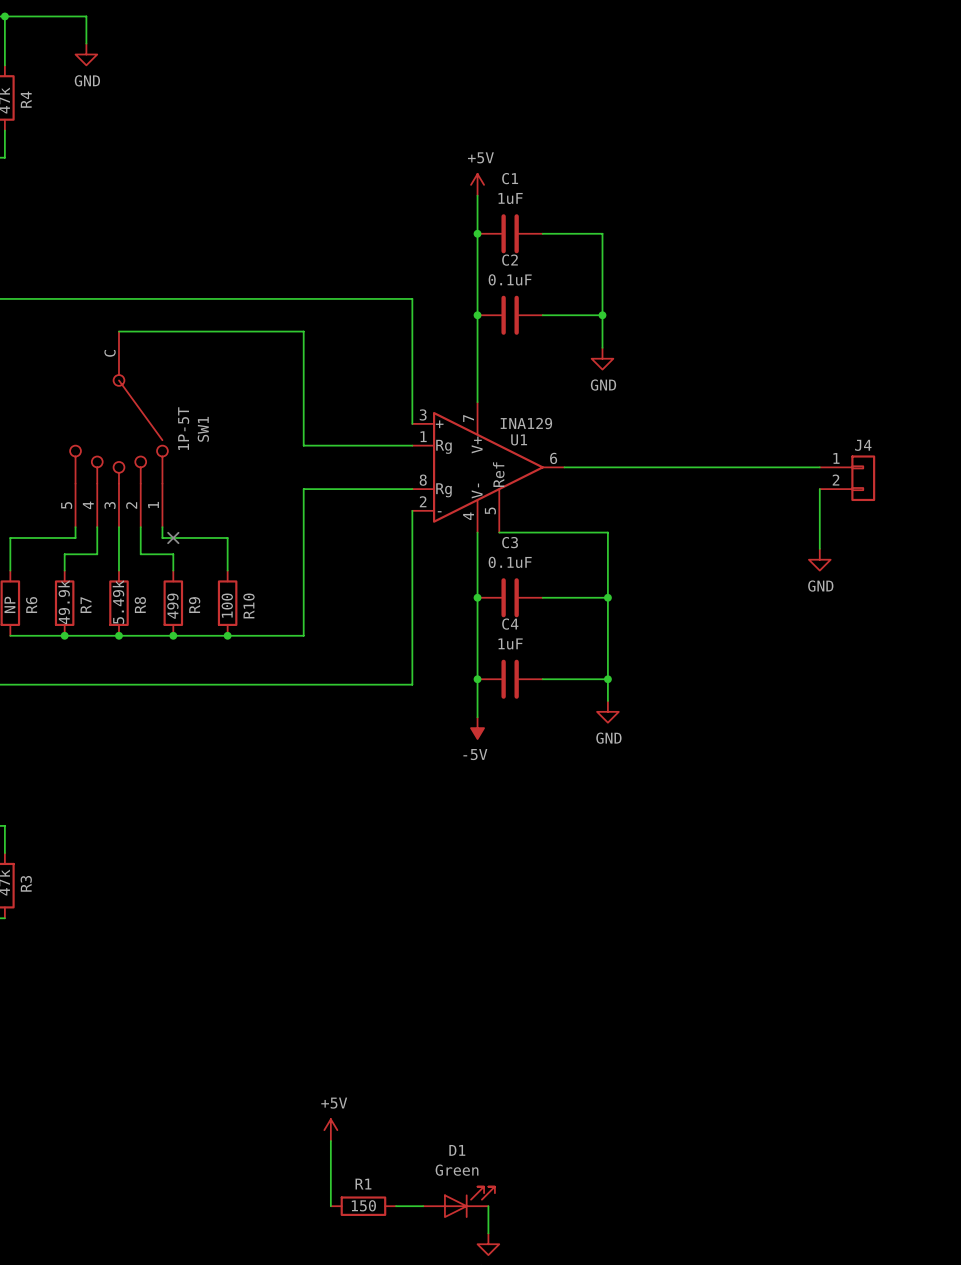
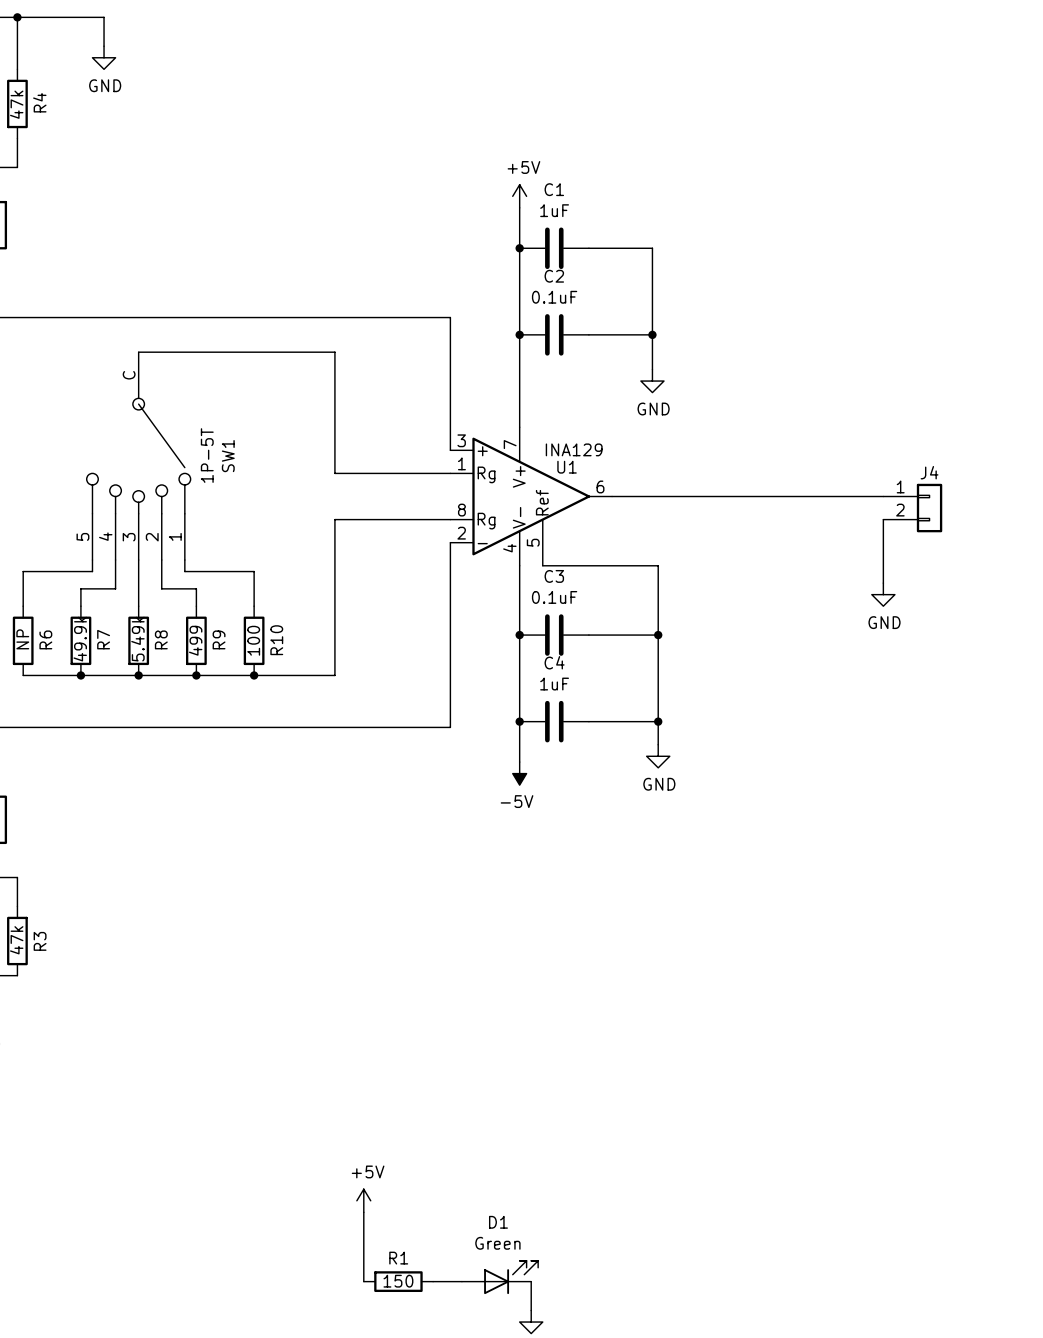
no-connect mark: (173, 537) -> none

